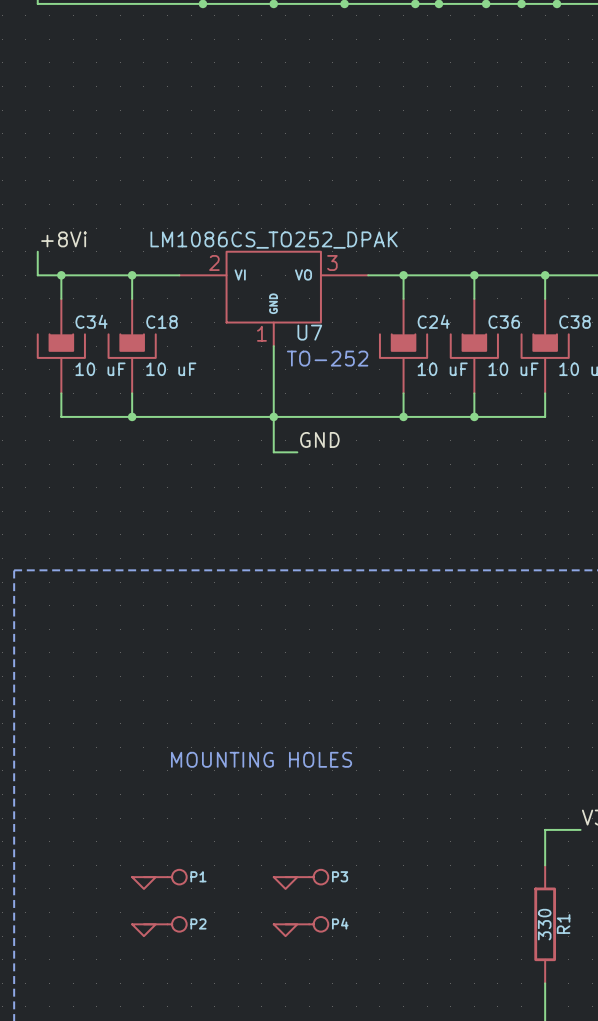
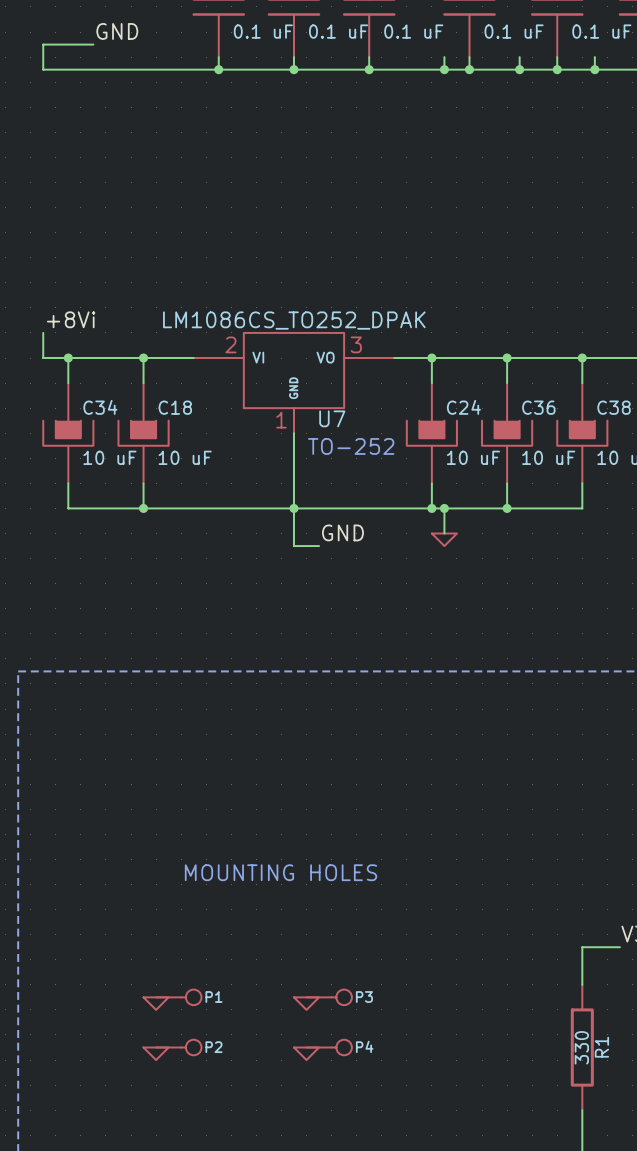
wire: none -> (444, 508) (444, 533)
junction: none -> (444, 508)
power symbol: none -> (444, 539)

